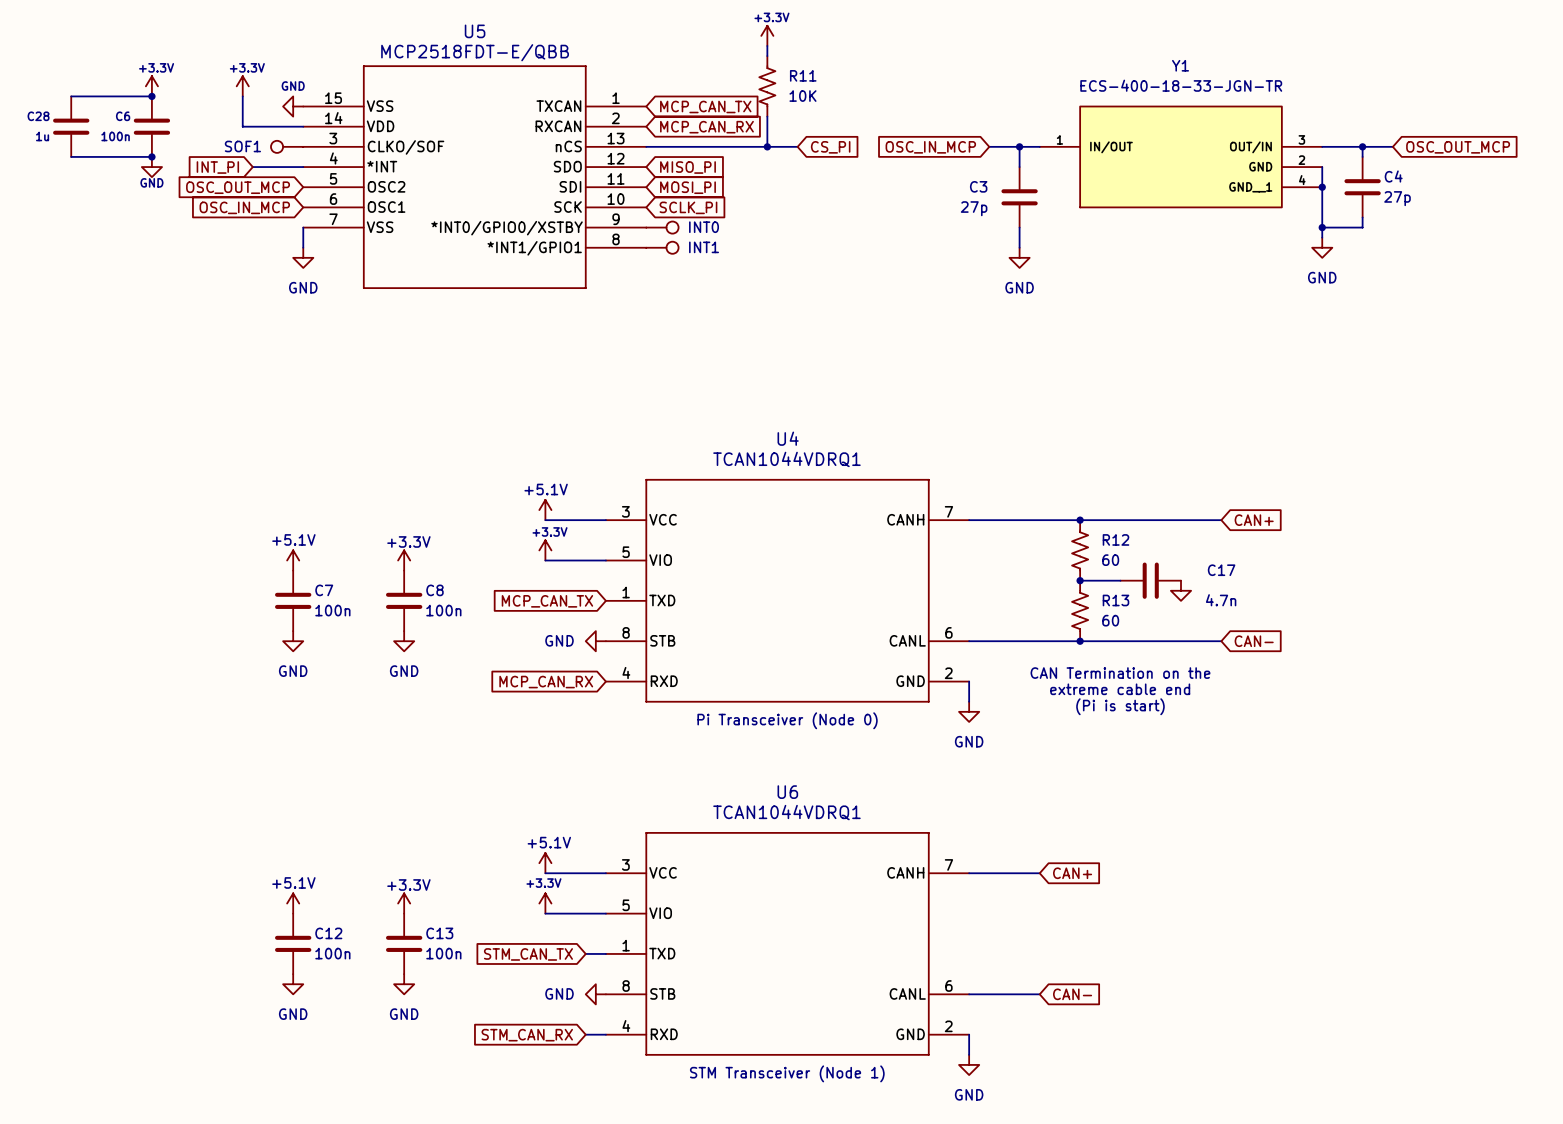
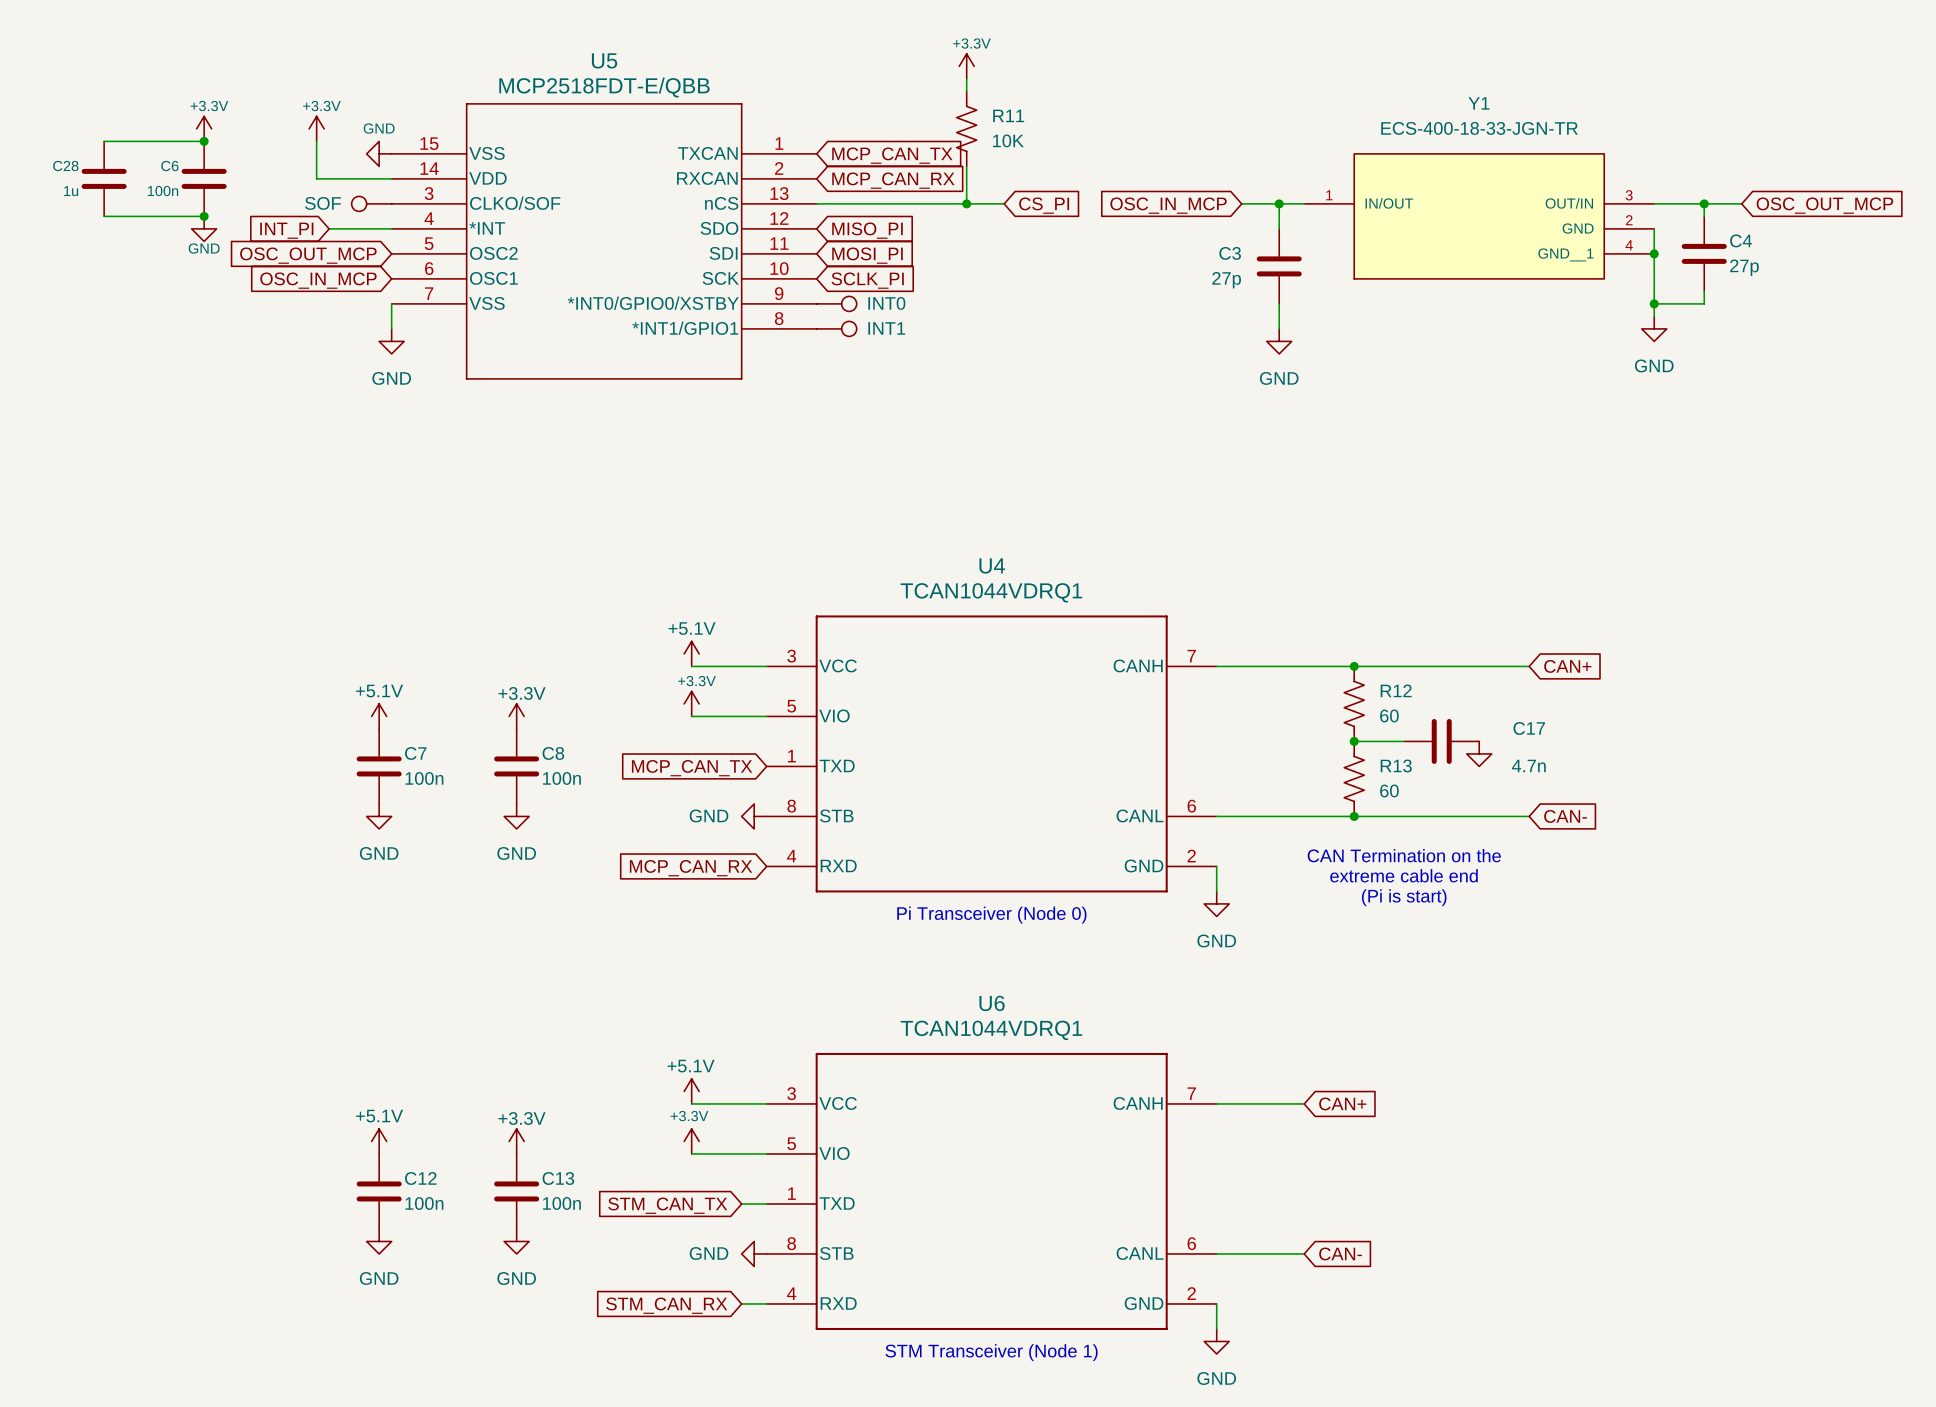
SOF1 name: SOF1 (242, 146) -> SOF (323, 203)

